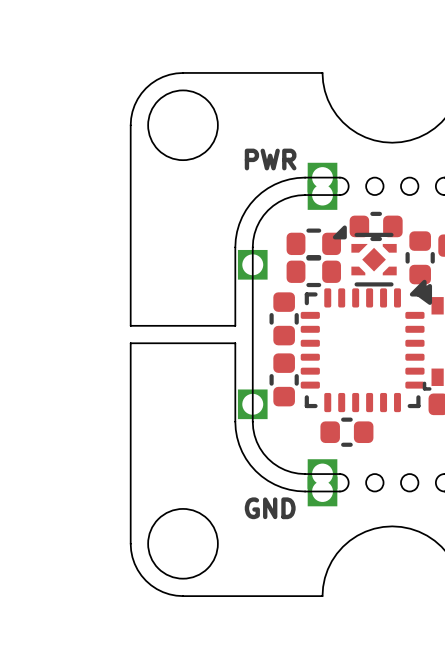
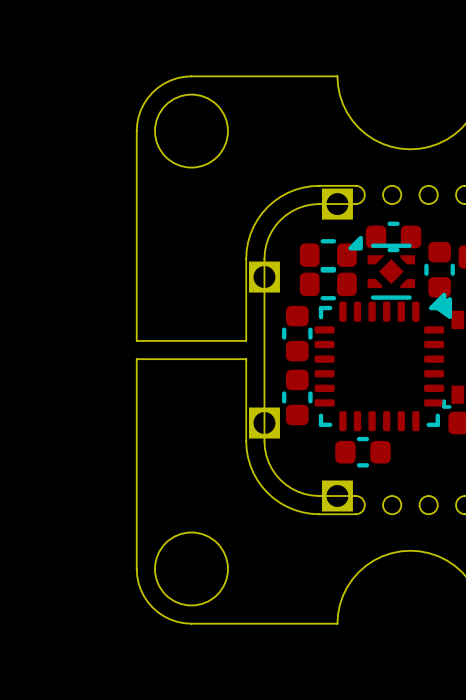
part: PWR (322, 177) -> none
part: GND (322, 491) -> none

